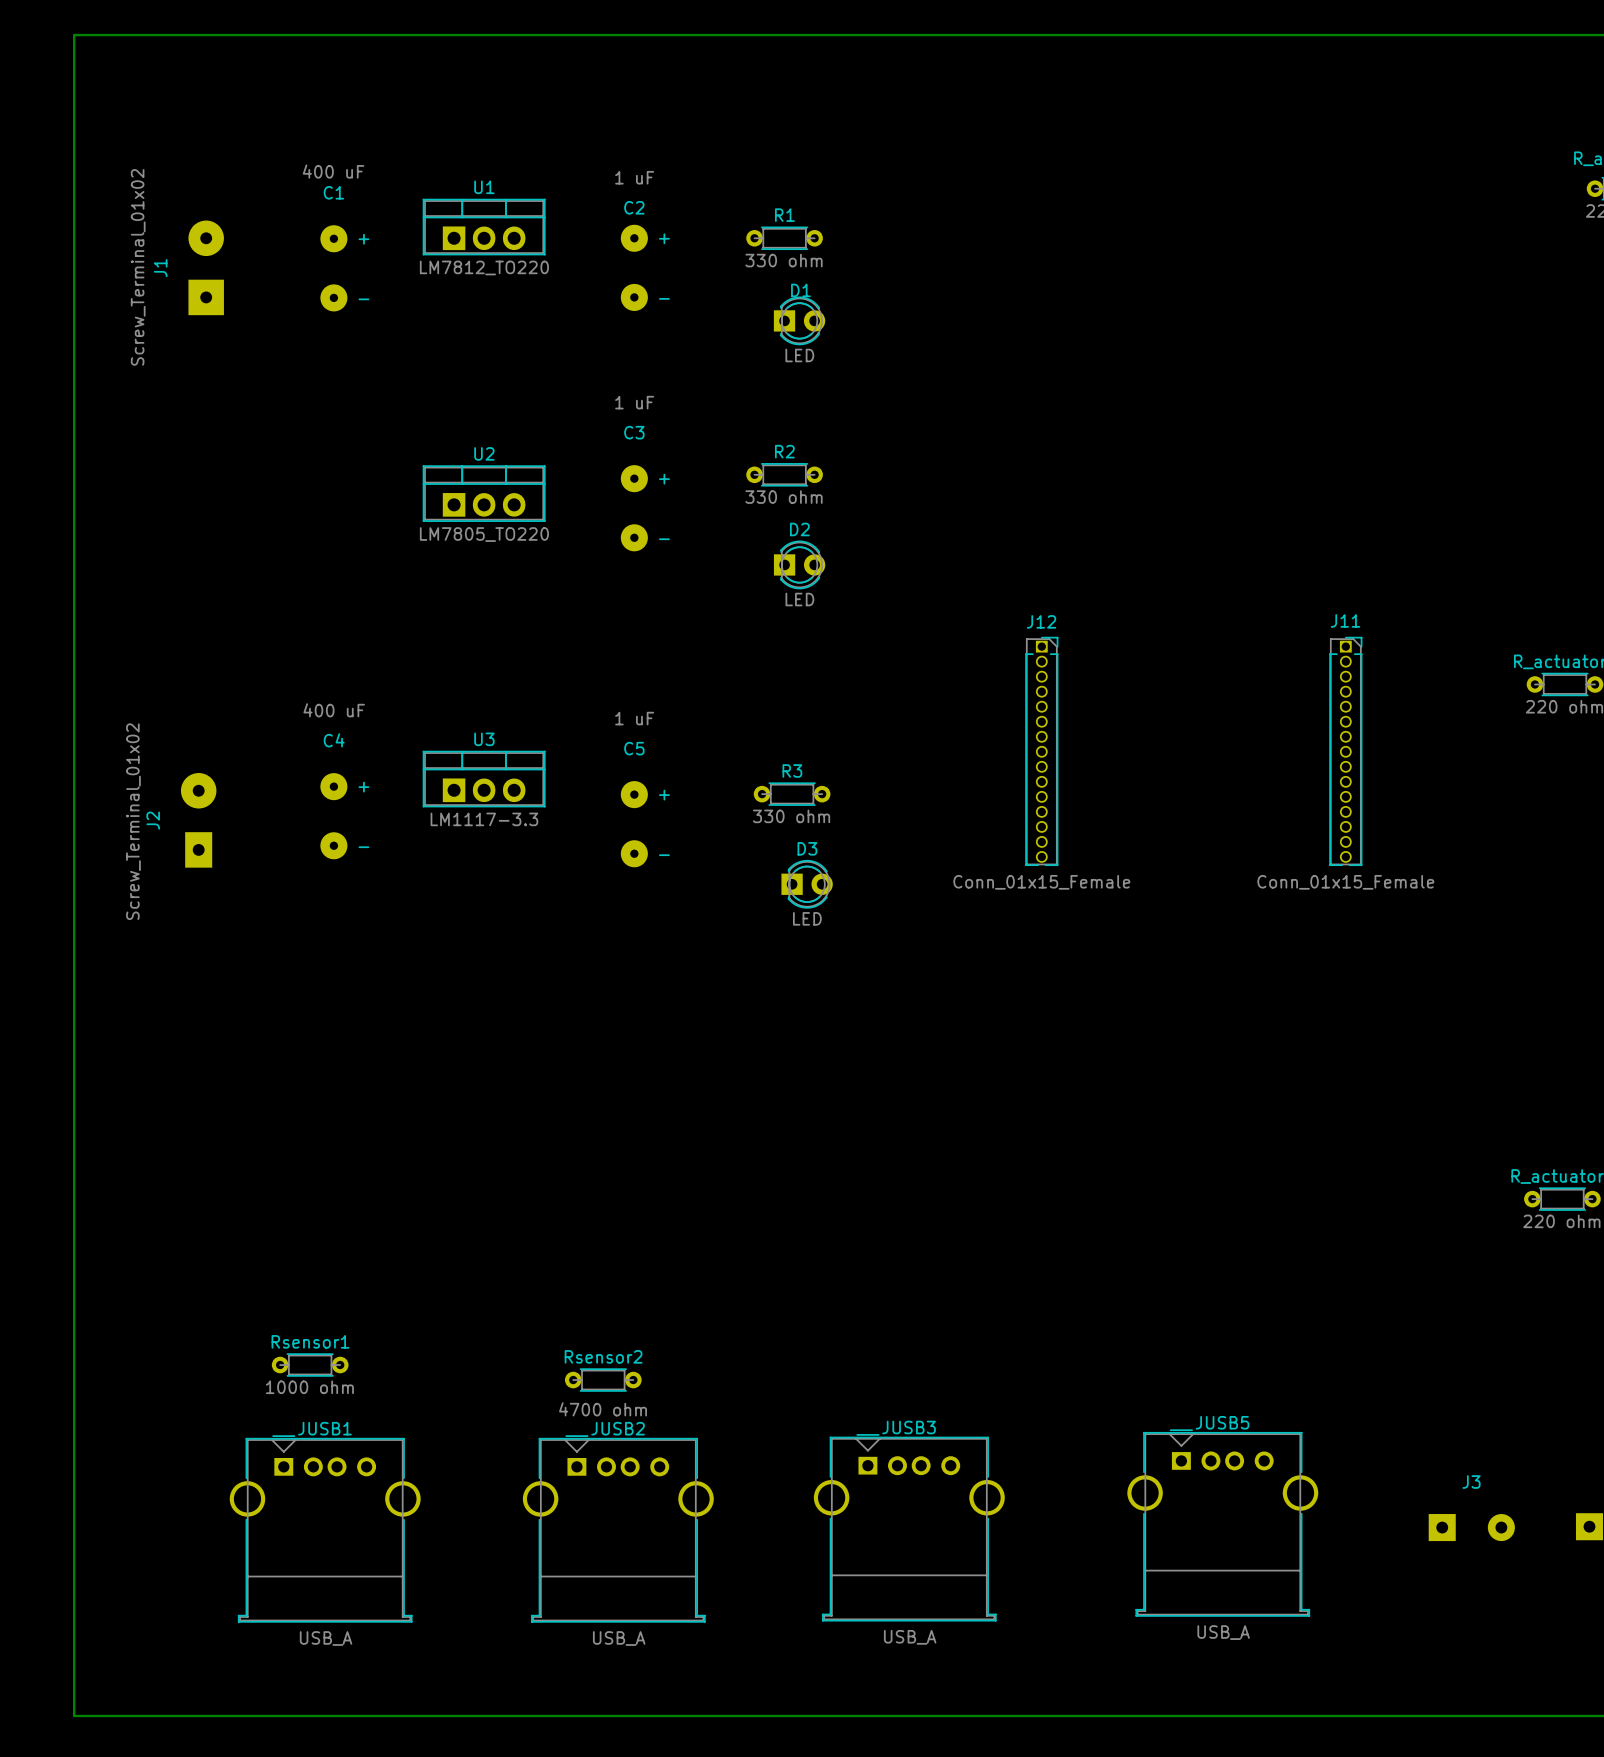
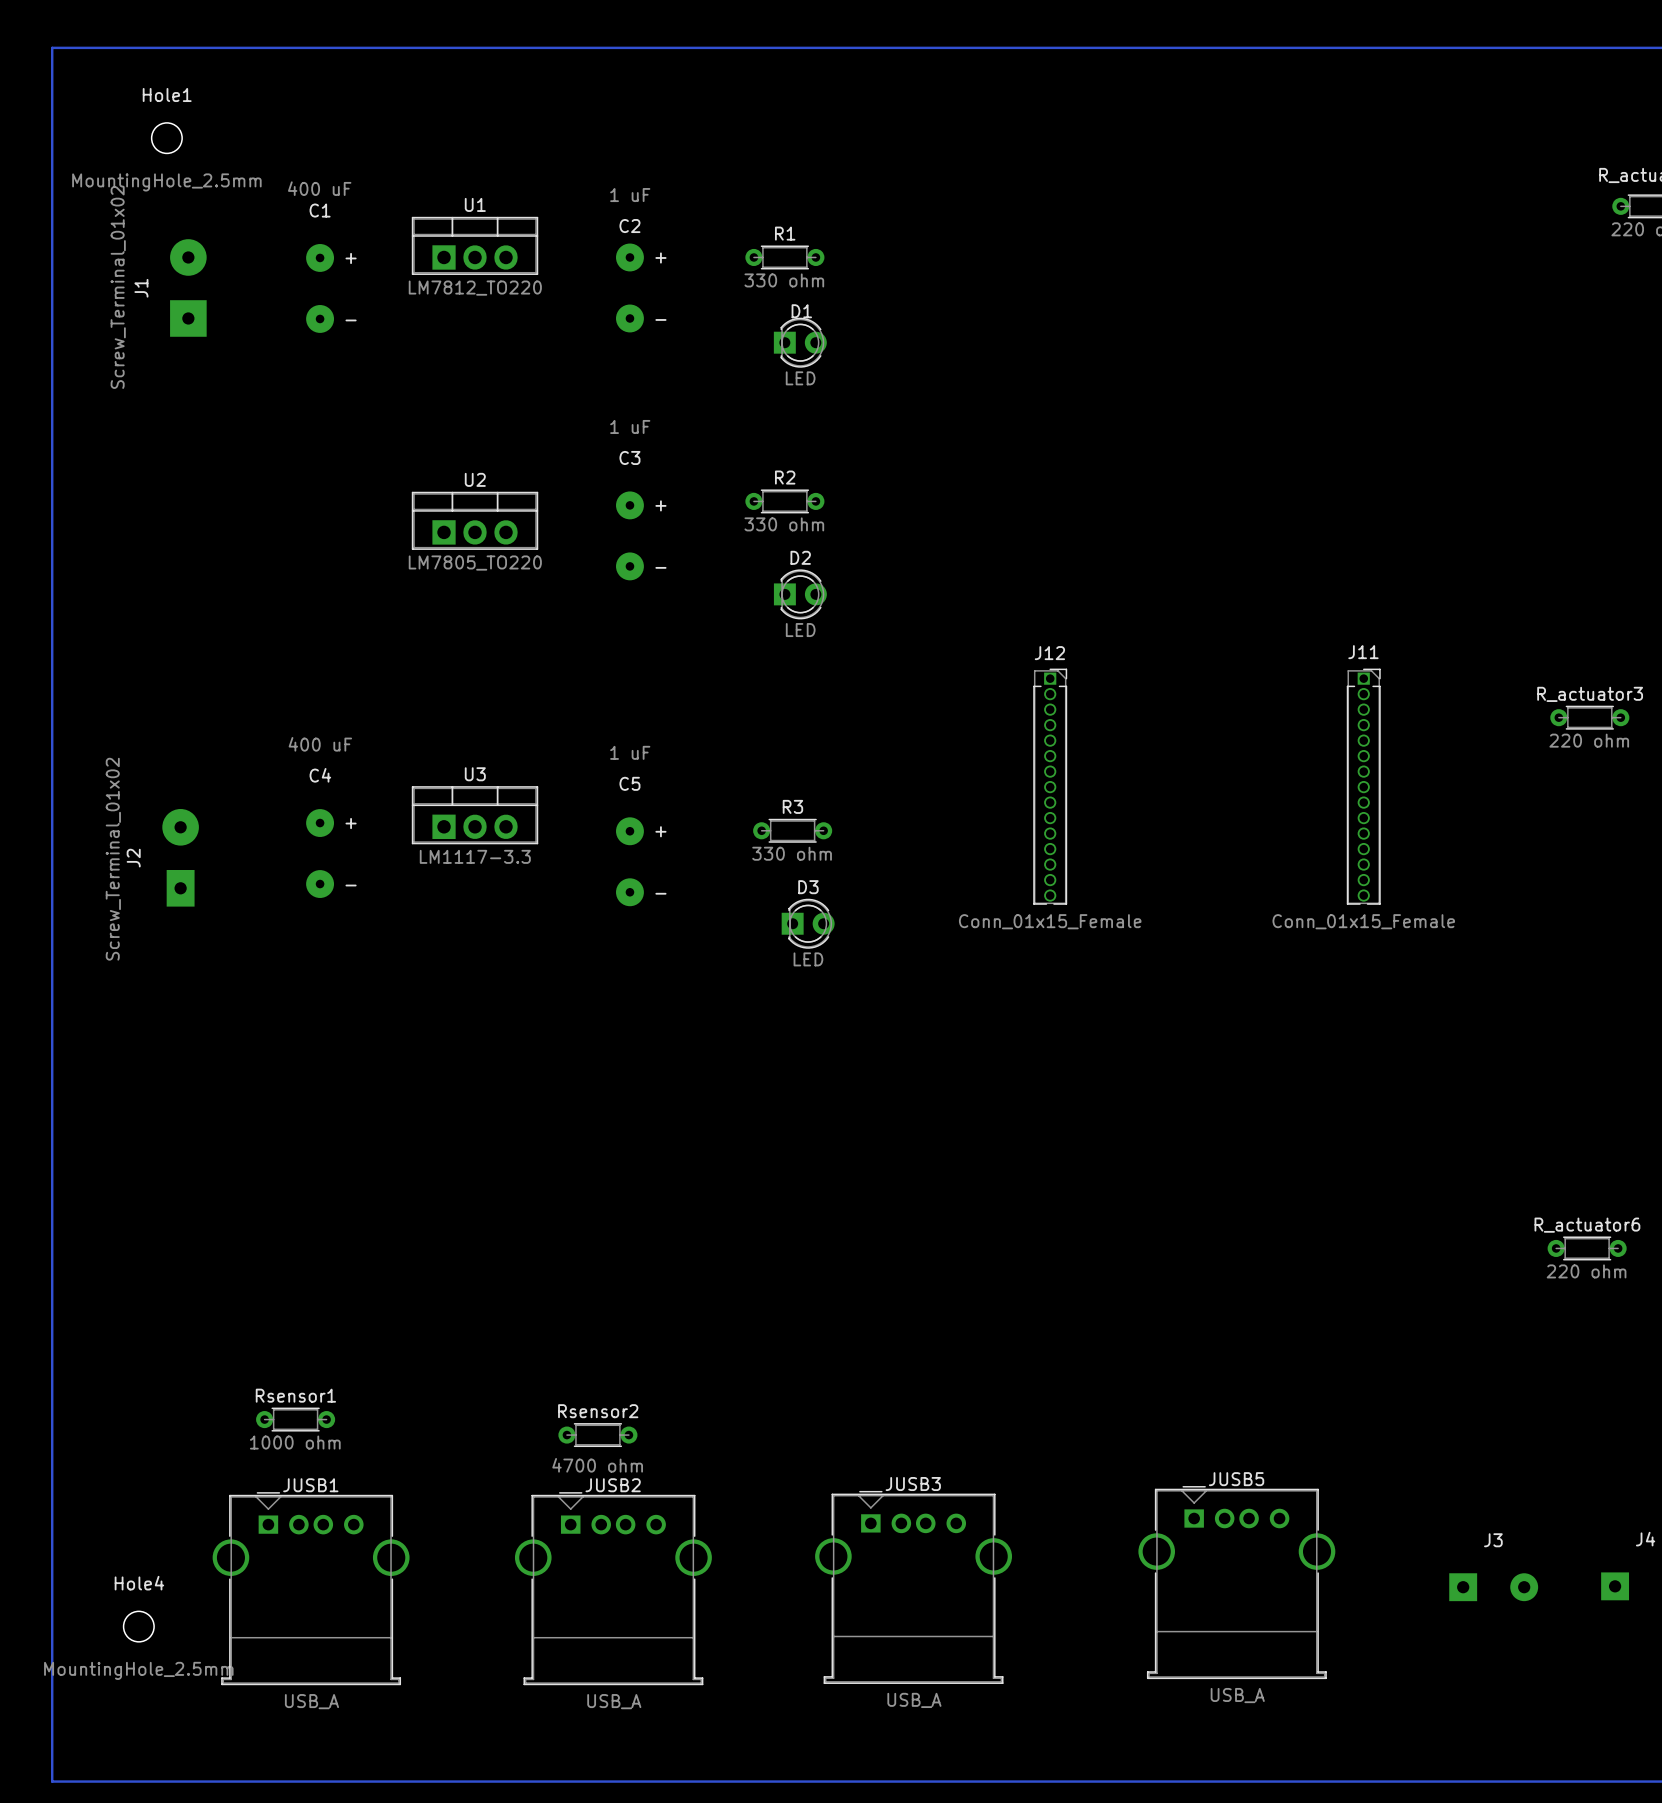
Hole1: none -> MountingHole_2.5mm (166, 138)
Hole4: none -> MountingHole_2.5mm (138, 1626)

